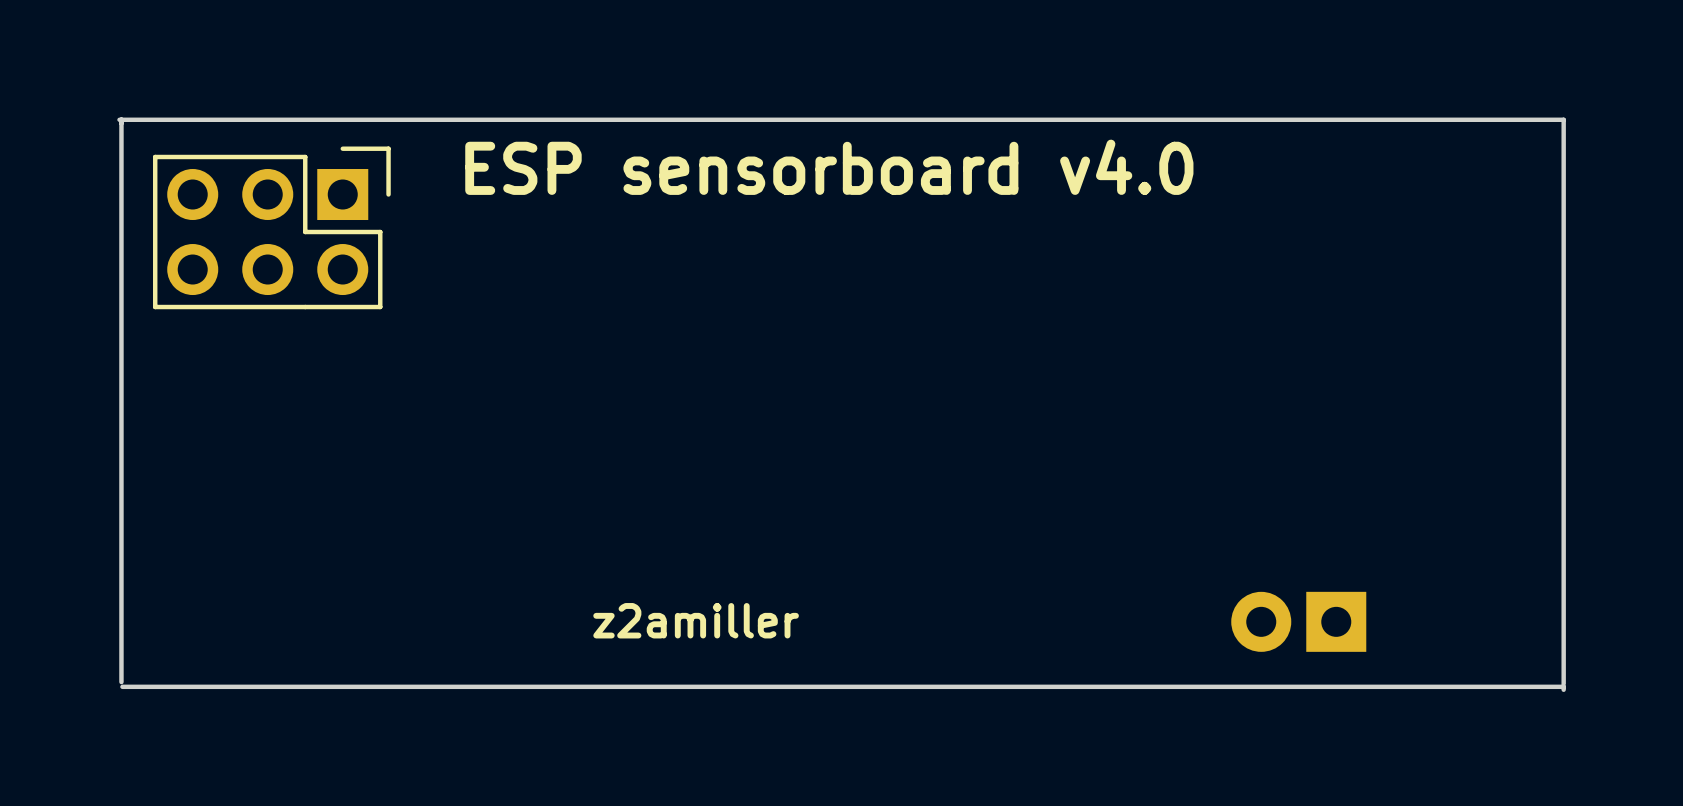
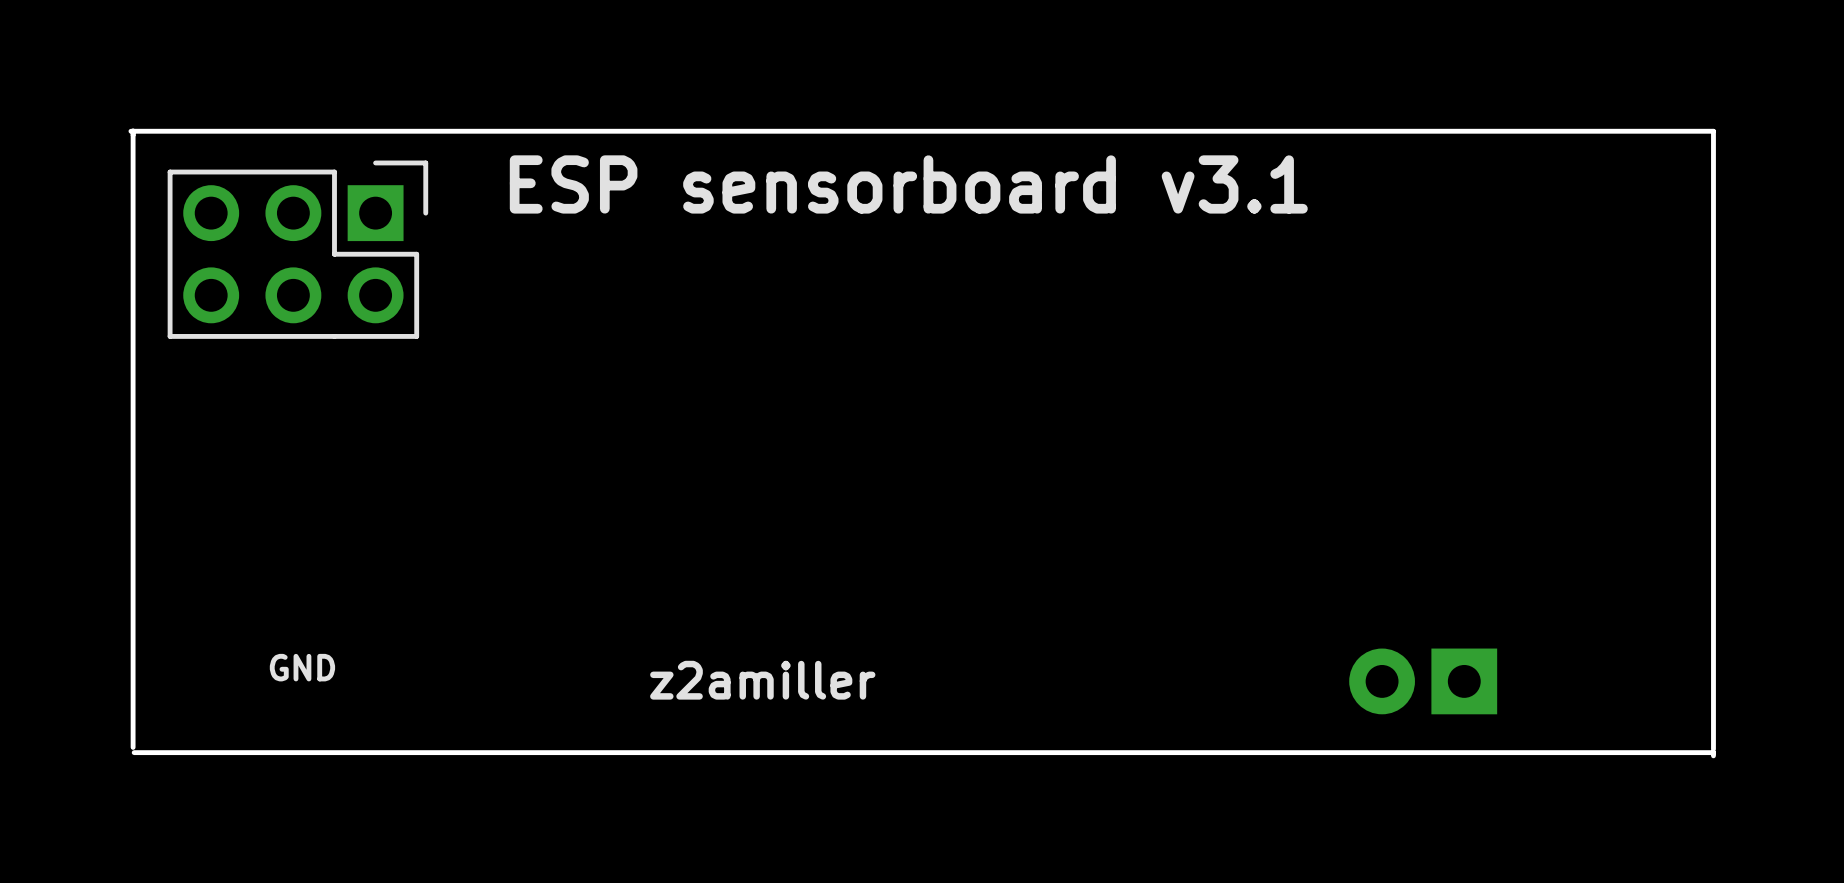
text: ESP sensorboard v4.0 (829, 167) -> ESP sensorboard v3.1 (908, 184)
text: none -> GND (302, 667)

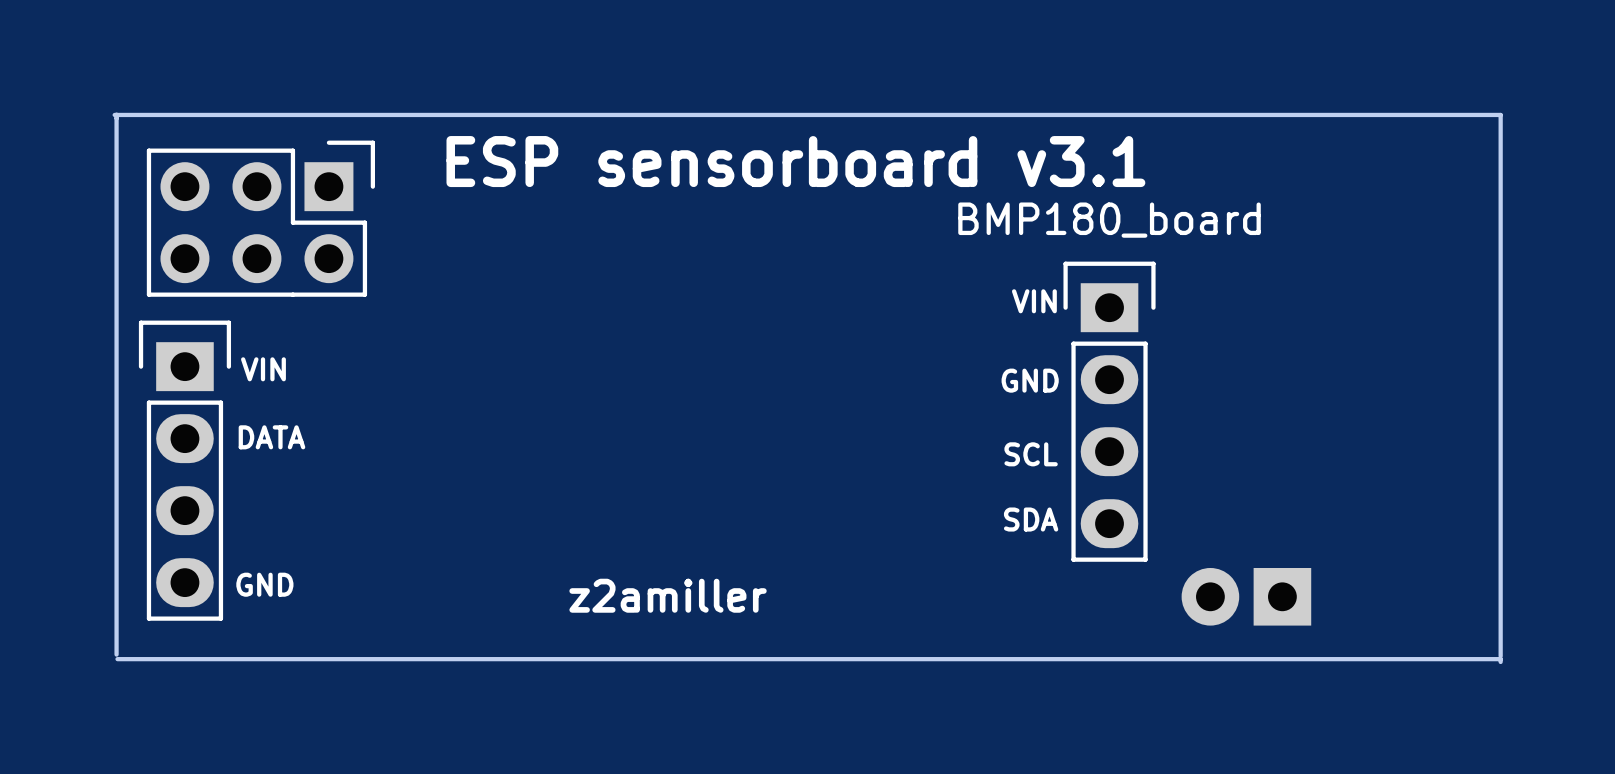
text: none -> VIN (1034, 301)
text: none -> VIN (263, 369)
text: none -> GND (1030, 380)
part: none -> BMP180_board (1109, 411)
text: none -> DATA (271, 437)
text: none -> SCL (1031, 454)
part: none -> (184, 470)
text: none -> SDA (1031, 519)

